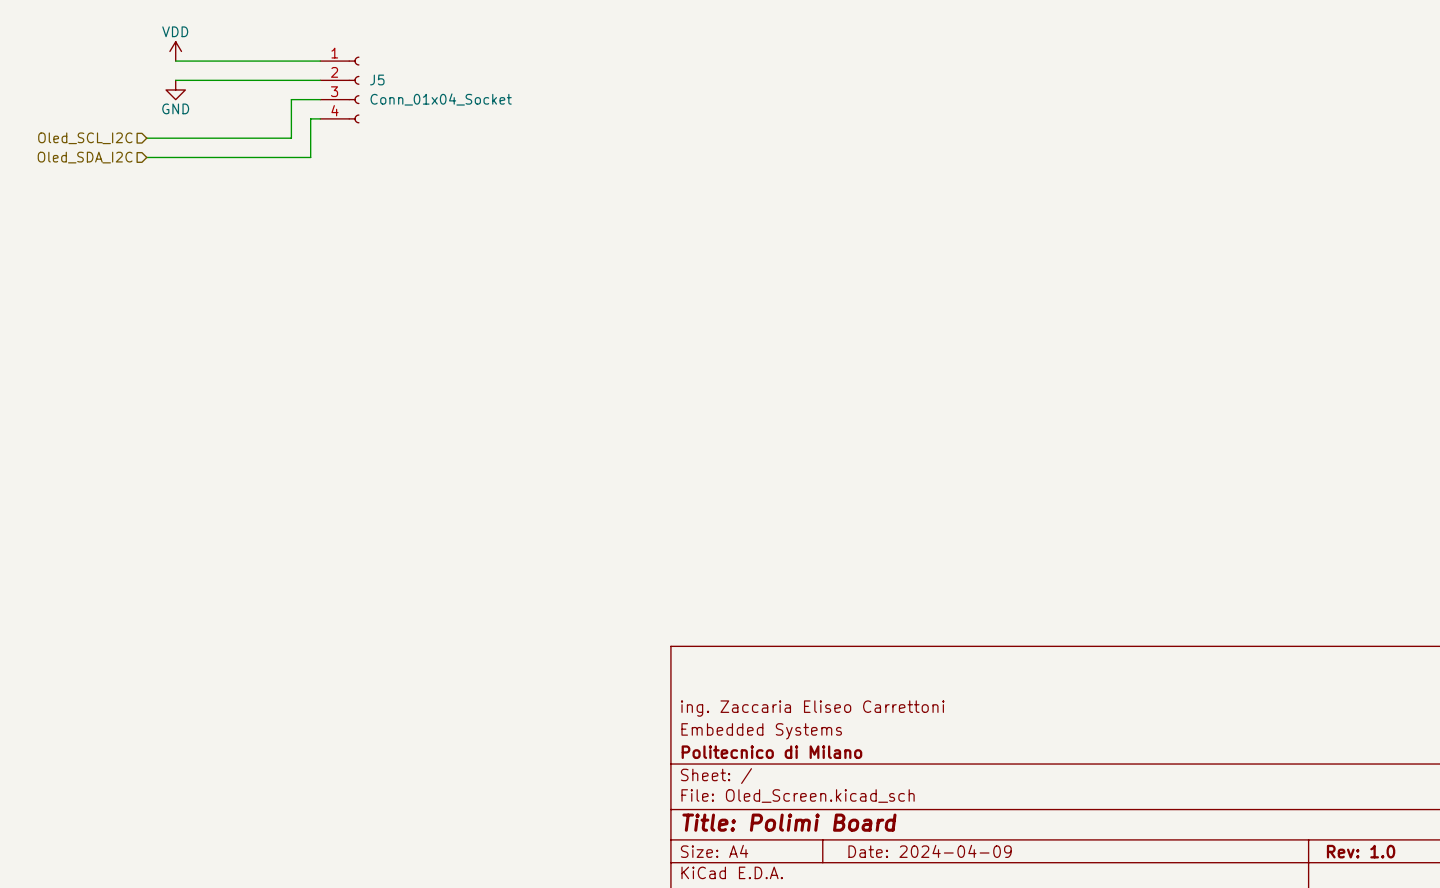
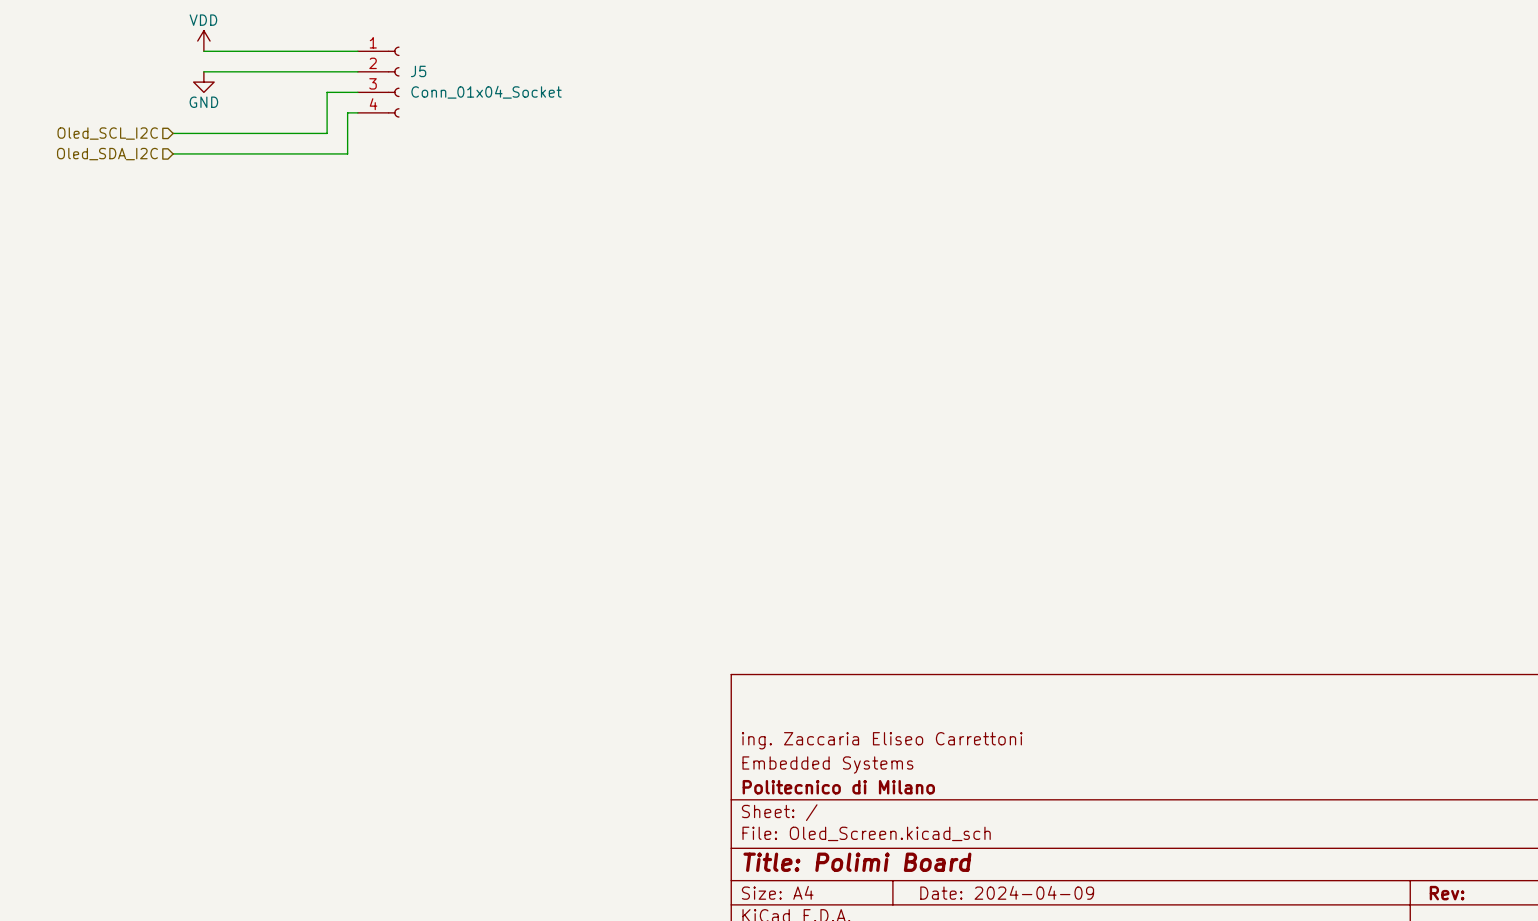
title block: Rev: 1.0 (1361, 851) -> Rev: (1447, 893)

